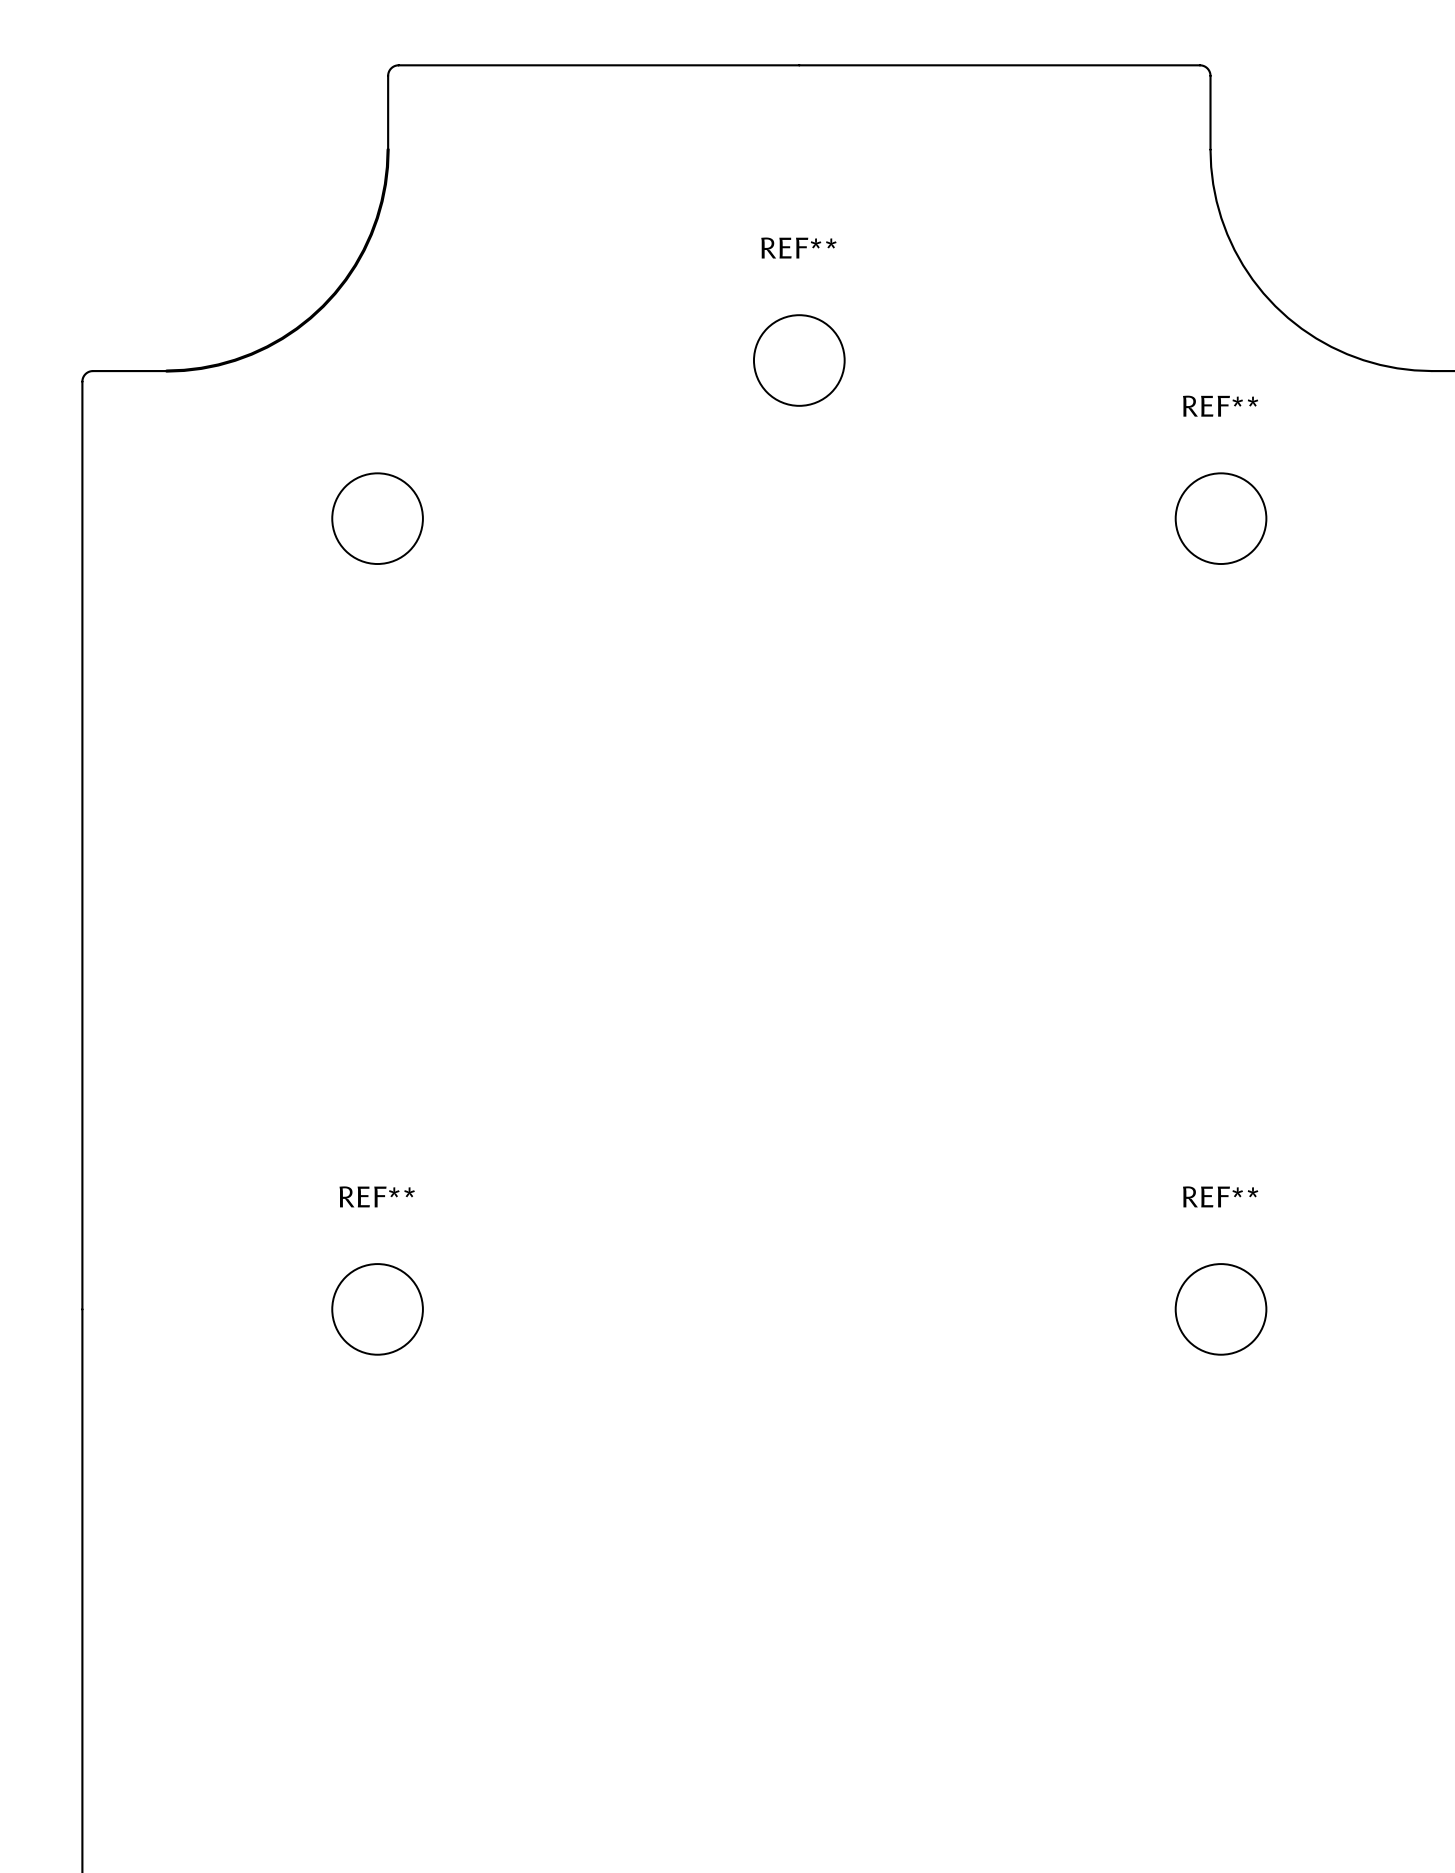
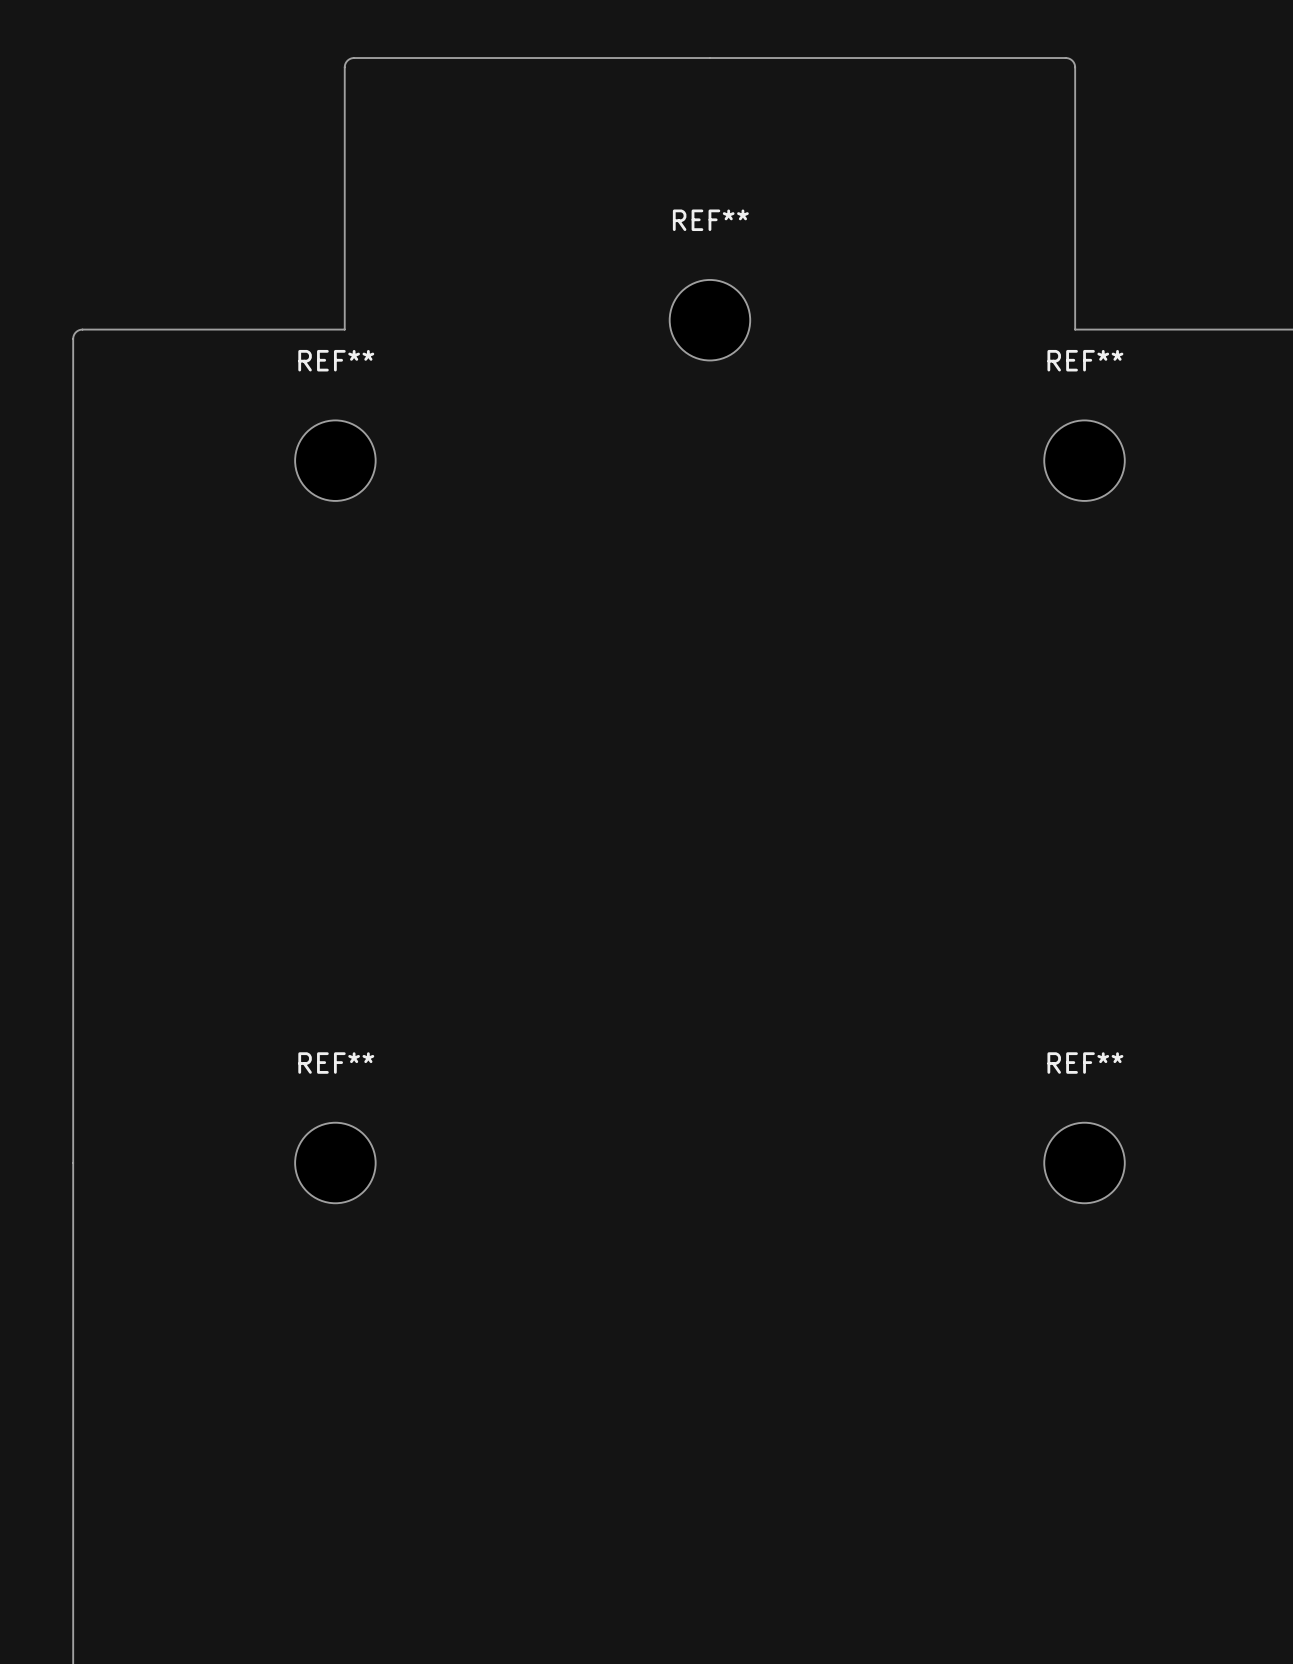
board edge: (388, 149) (382, 201) (371, 234) (345, 279) (323, 306) (282, 338) (251, 354) (201, 368) (166, 371) -> (344, 132) (344, 329) (148, 329)
board edge: (1210, 149) (1213, 184) (1227, 234) (1243, 265) (1275, 306) (1316, 338) (1347, 354) (1380, 364) (1431, 371) -> (1075, 132) (1075, 329) (1271, 329)
REF** name: none -> REF** (336, 360)

